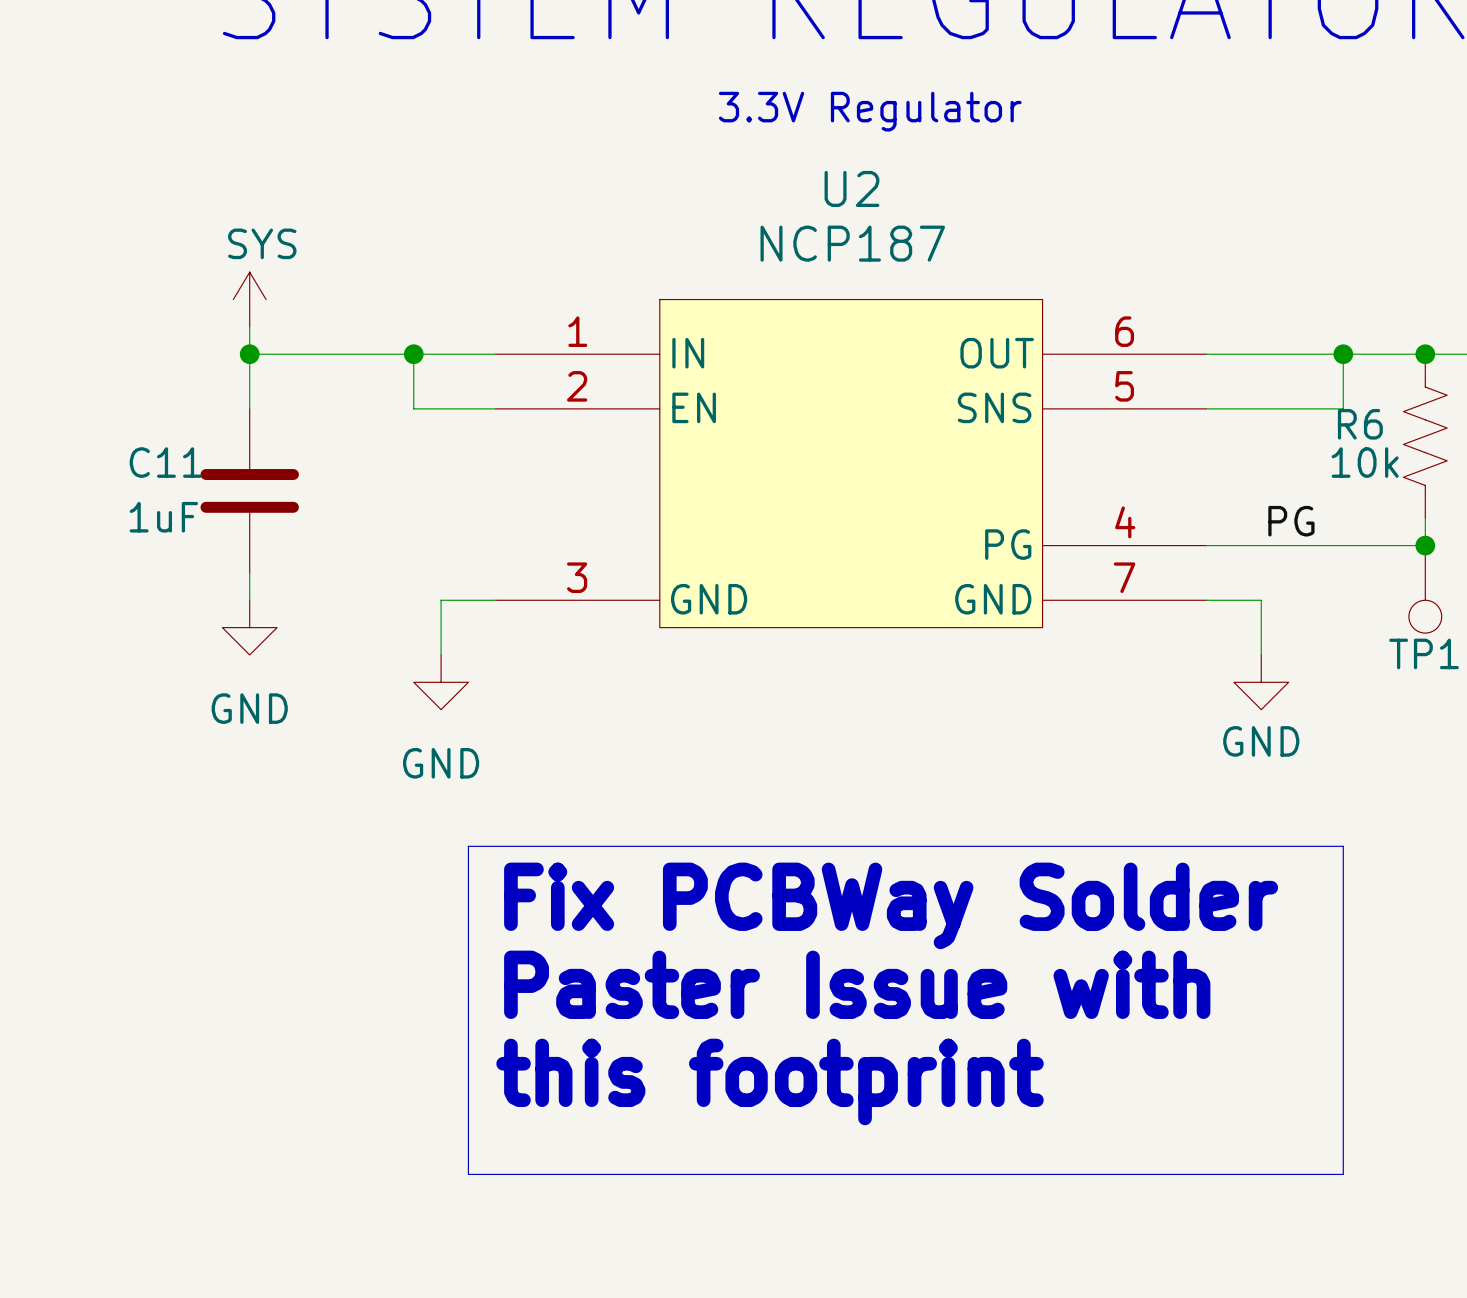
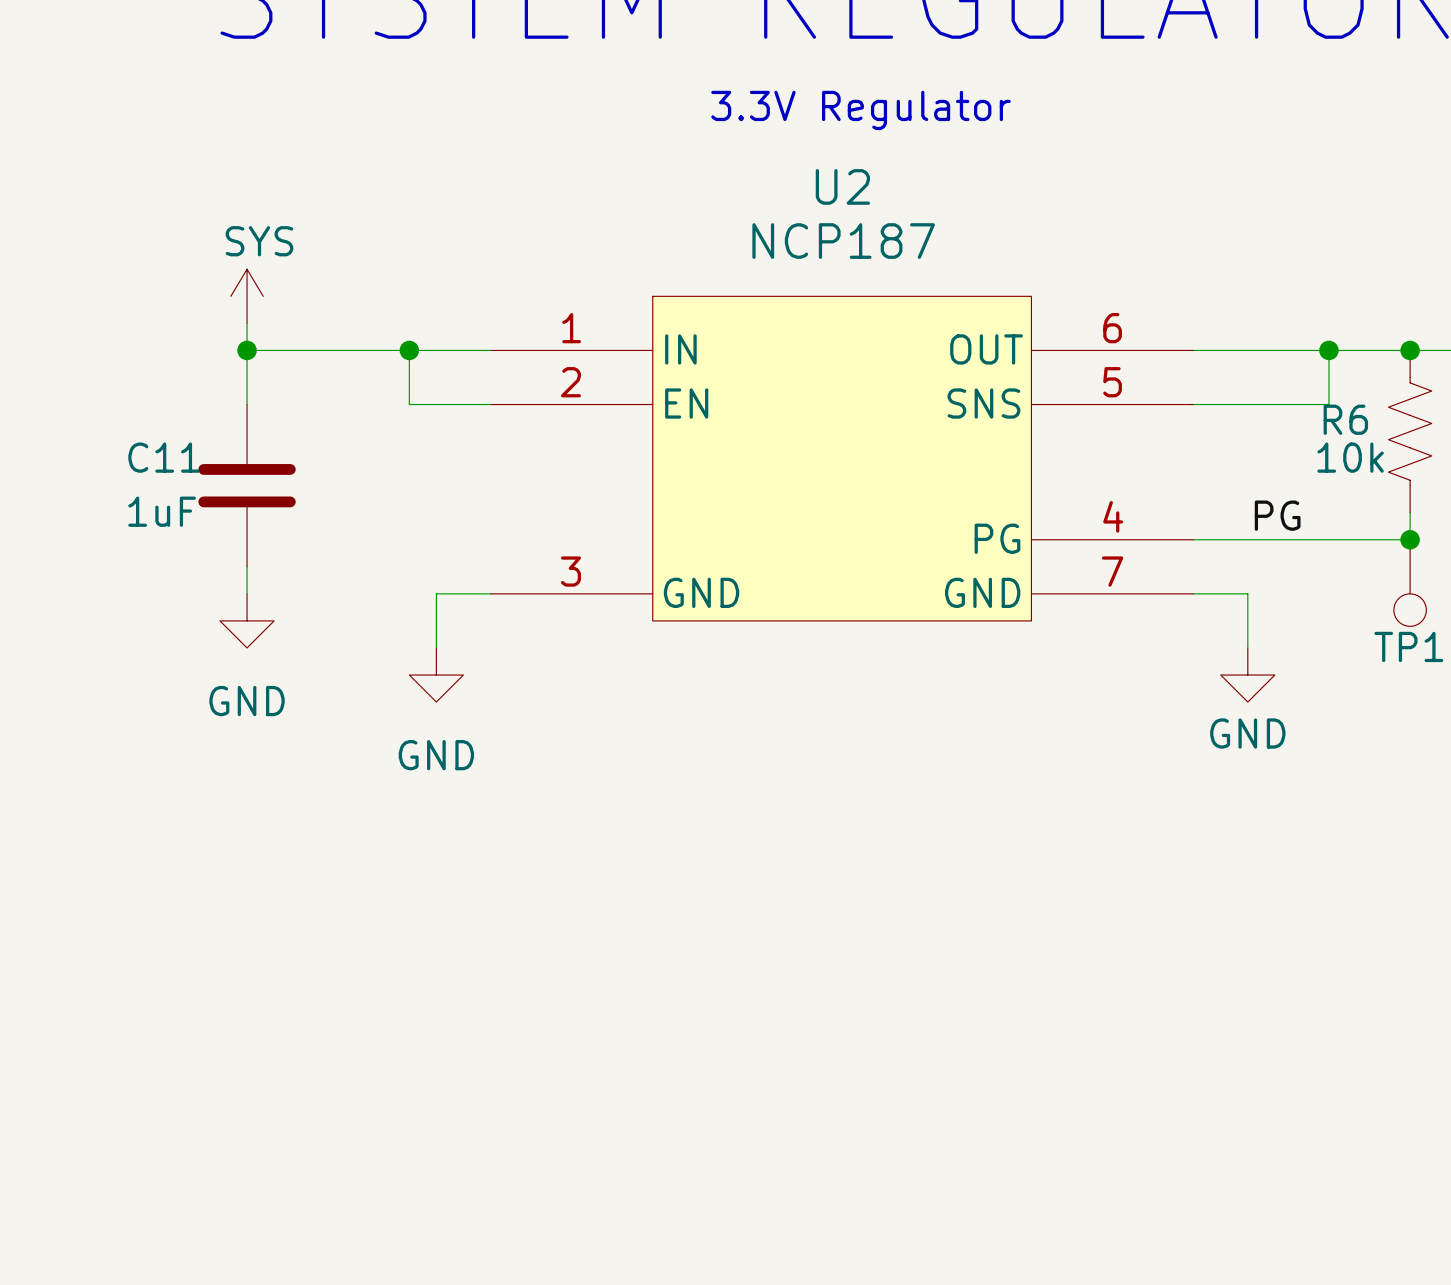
line: (468, 846) (1343, 846) (1343, 1174) (468, 1174) (468, 846) -> none
text: Fix PCBWay Solder (891, 905) -> none
text: Paster Issue with (857, 984) -> none
text: this footprint (770, 1081) -> none

